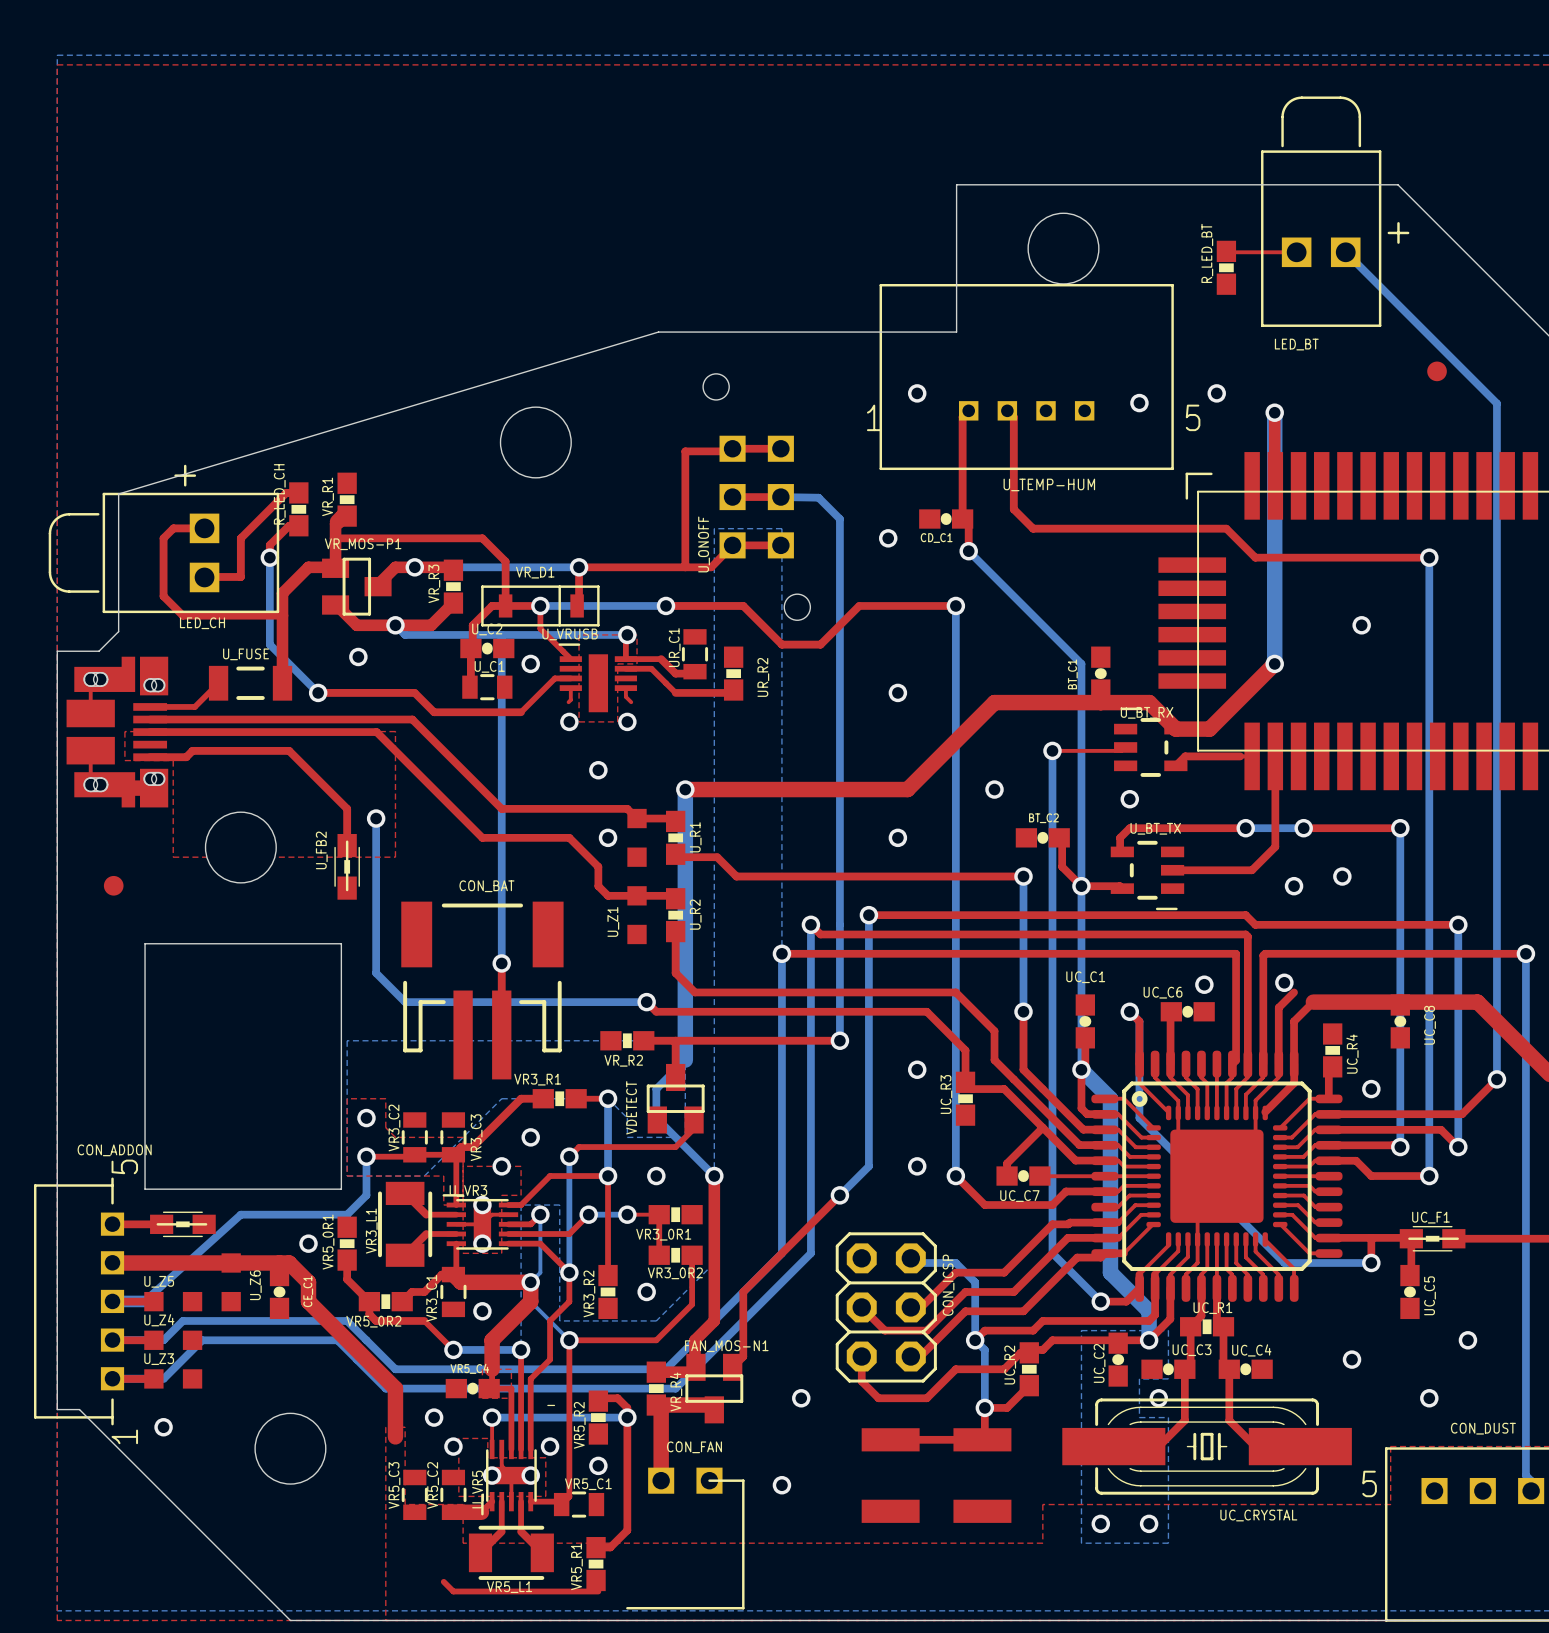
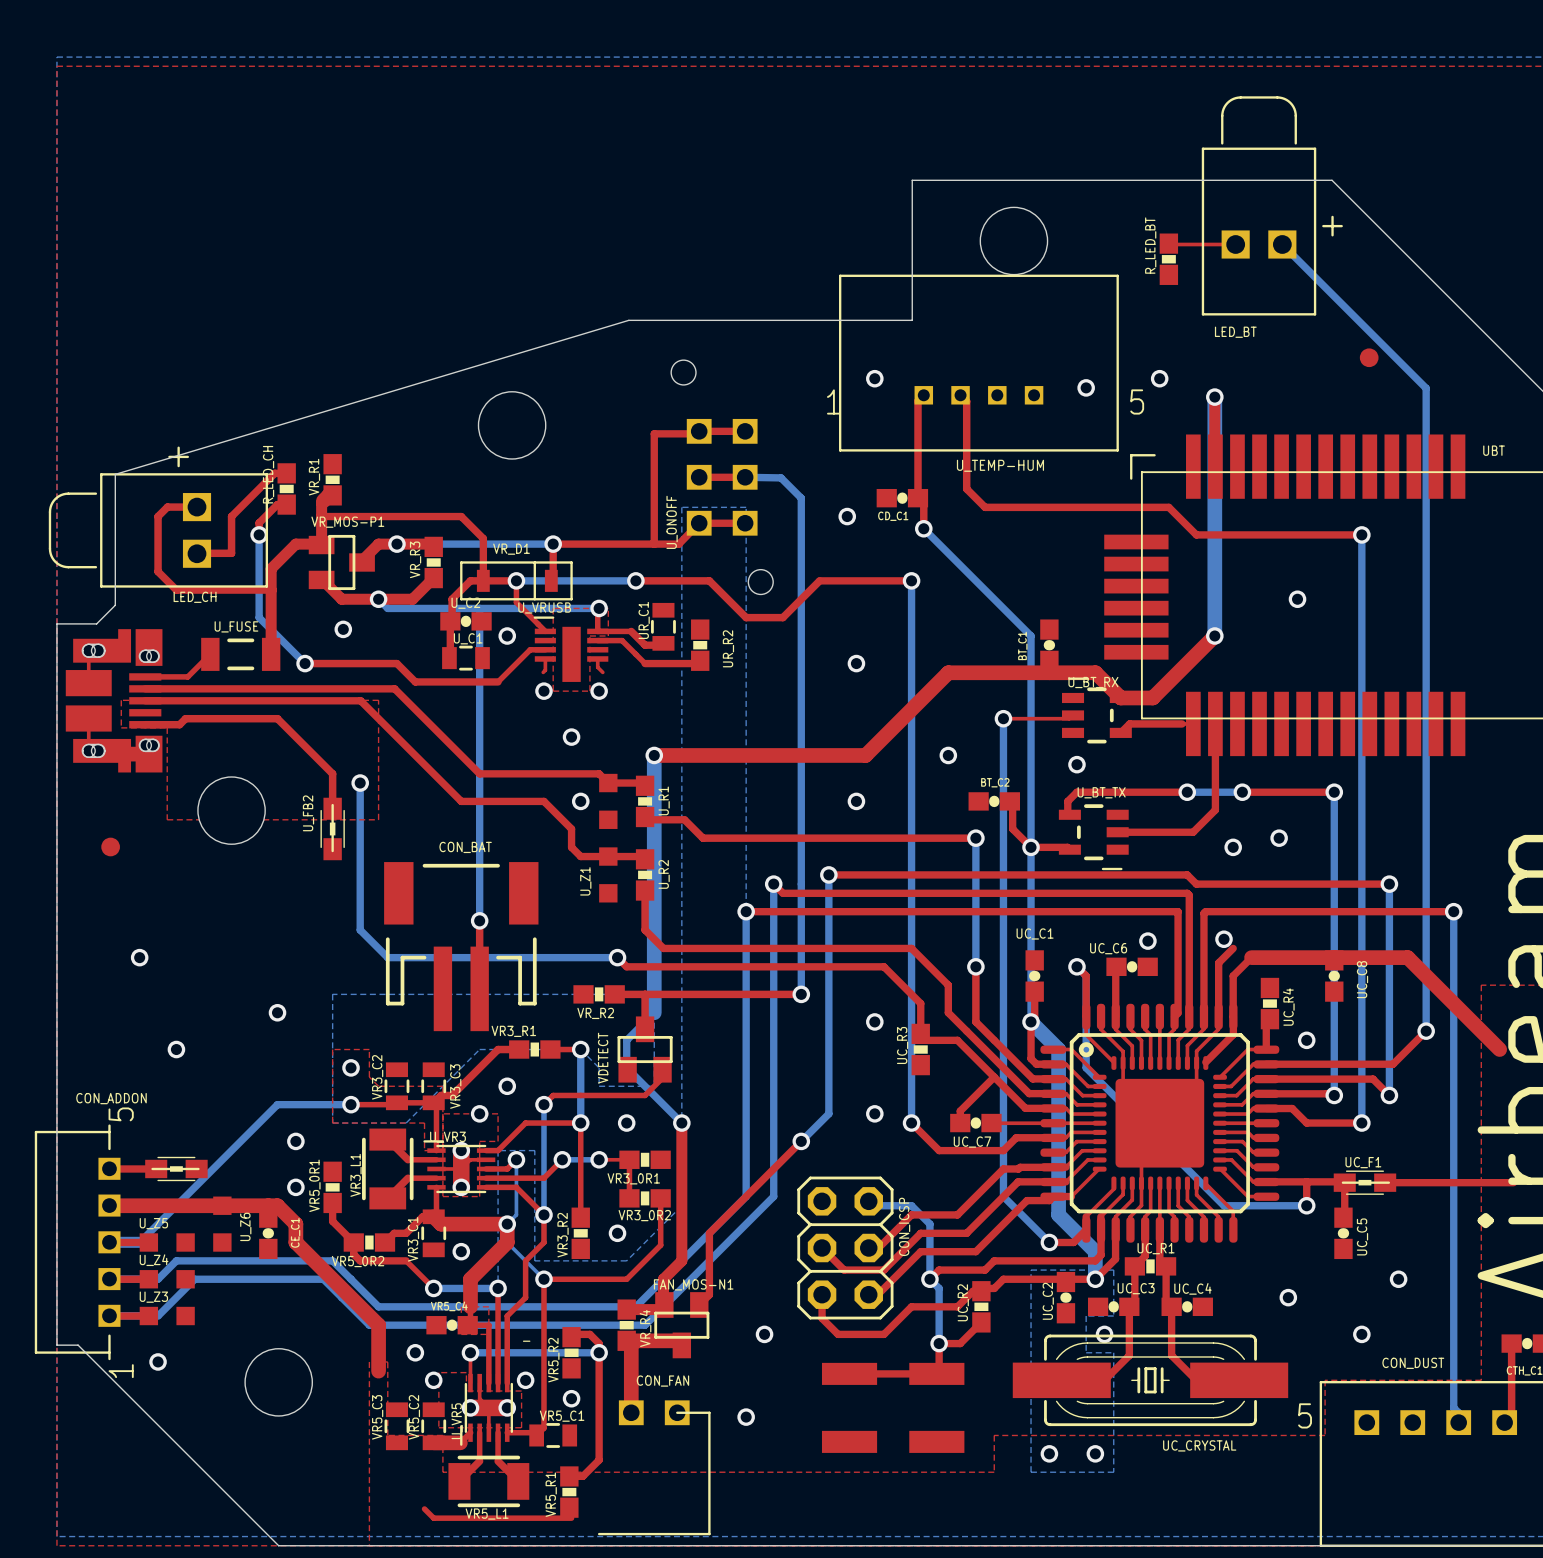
board edge: (145, 943) (145, 1189) (341, 1189) (341, 943) (145, 943) -> none
via: none -> (139, 957)
via: none -> (277, 1012)
via: none -> (176, 1049)
bottom track: (366, 1156) (366, 1195) (347, 1214) (240, 1214) (144, 1301) -> (351, 1104) (277, 1104) (139, 1242)
via: none -> (295, 1141)

